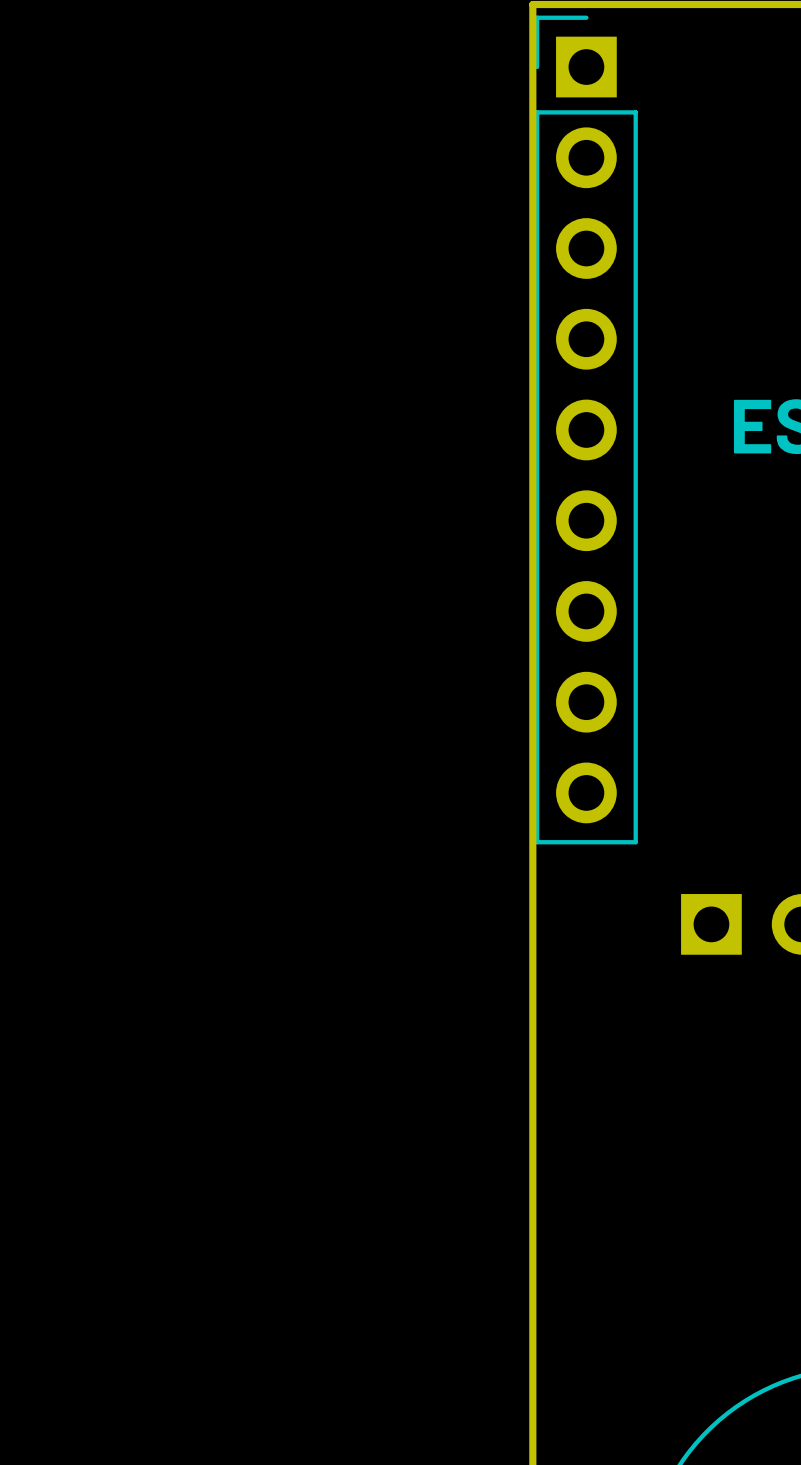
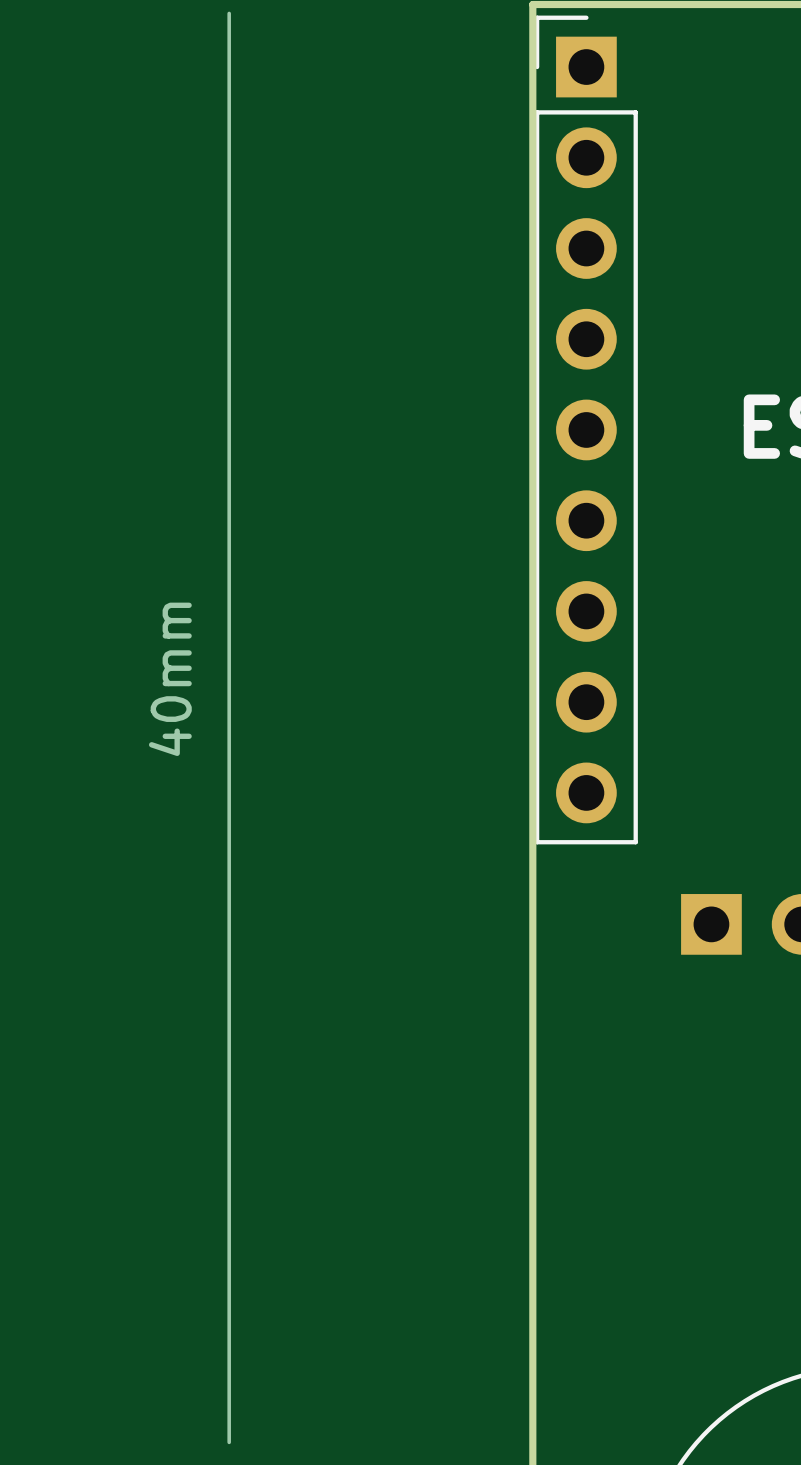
line: none -> (229, 13) (229, 1442)
text: none -> 40mm (170, 679)

